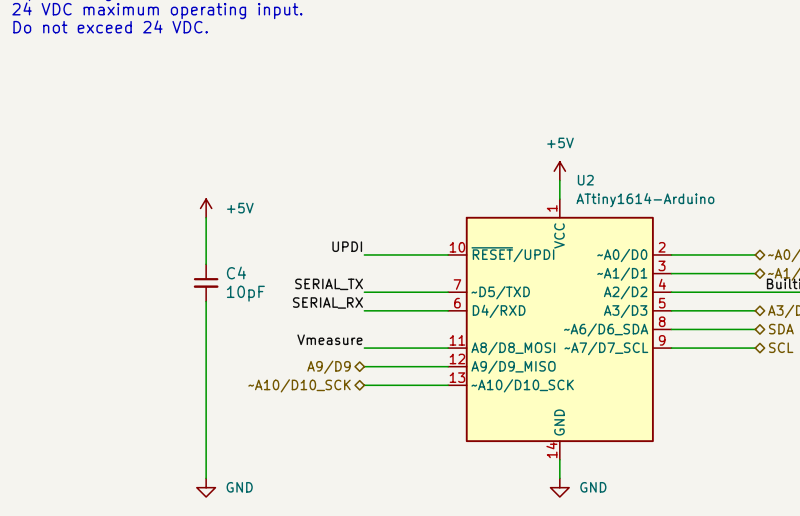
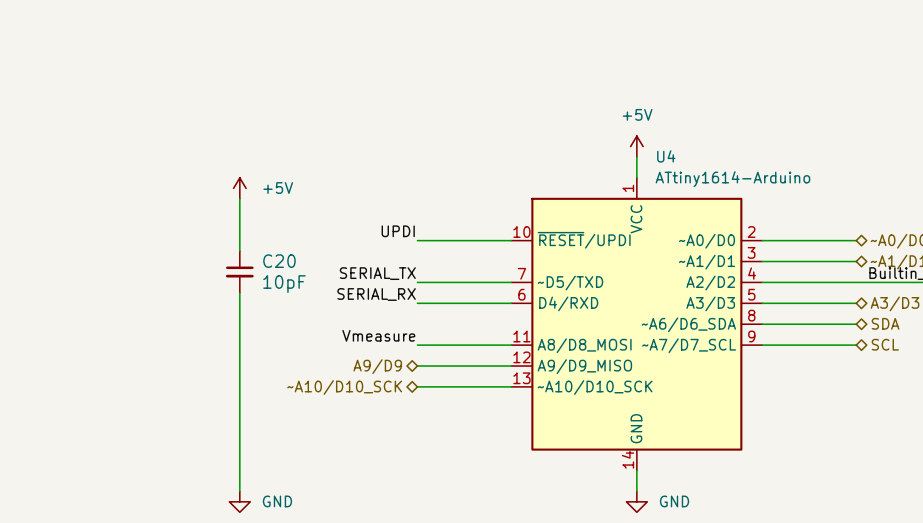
U2 name: U2 (585, 180) -> U4 (666, 156)
C4 name: C4 (236, 272) -> C20 (279, 261)

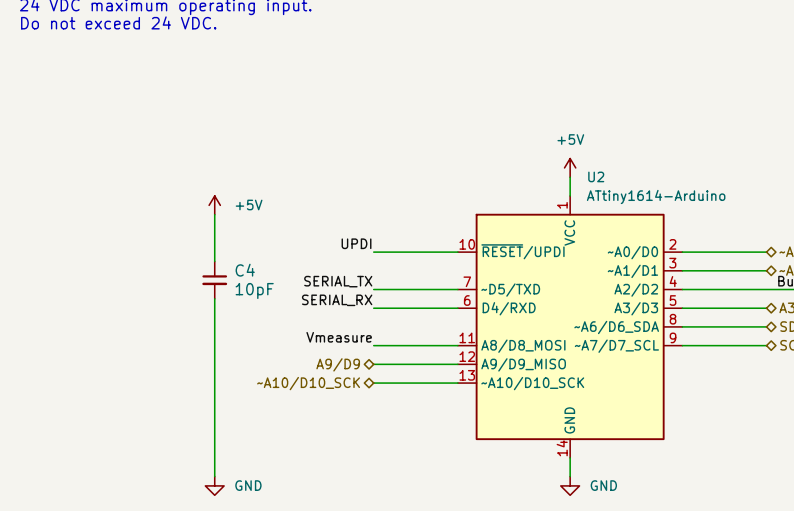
U4 name: U4 (666, 156) -> U2 (596, 176)
C20 name: C20 (279, 261) -> C4 (245, 270)

